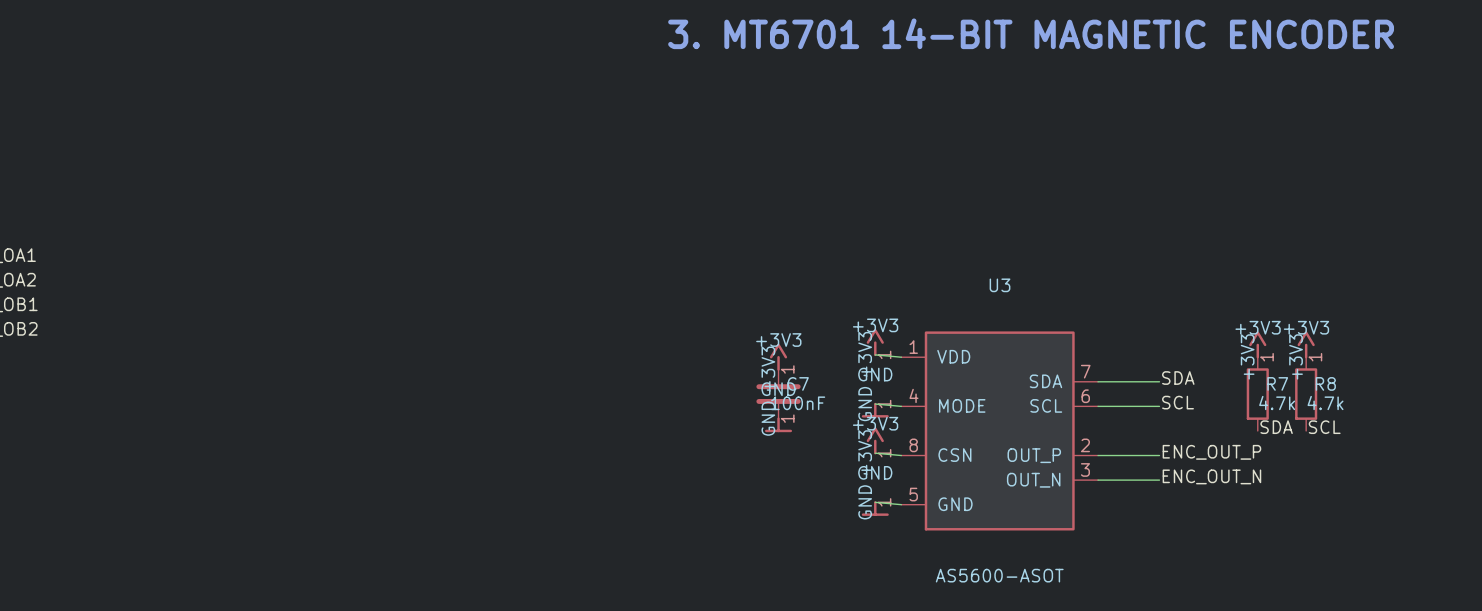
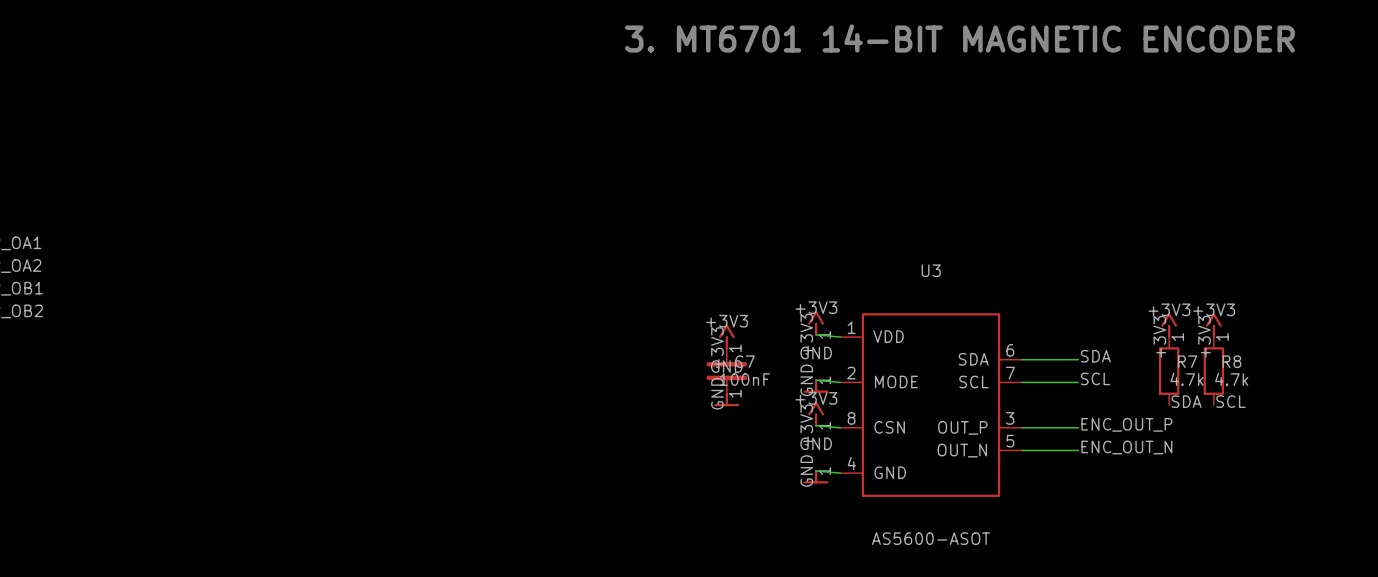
U3 pin number: 7 (1085, 371) -> 6 (1010, 350)
U3 pin number: 4 (913, 395) -> 2 (851, 373)
U3 pin number: 6 (1085, 396) -> 7 (1010, 373)
U3 pin number: 2 (1085, 445) -> 3 (1010, 418)
U3 pin number: 3 (1085, 469) -> 5 (1010, 441)
U3 pin number: 5 (913, 494) -> 4 (851, 463)

